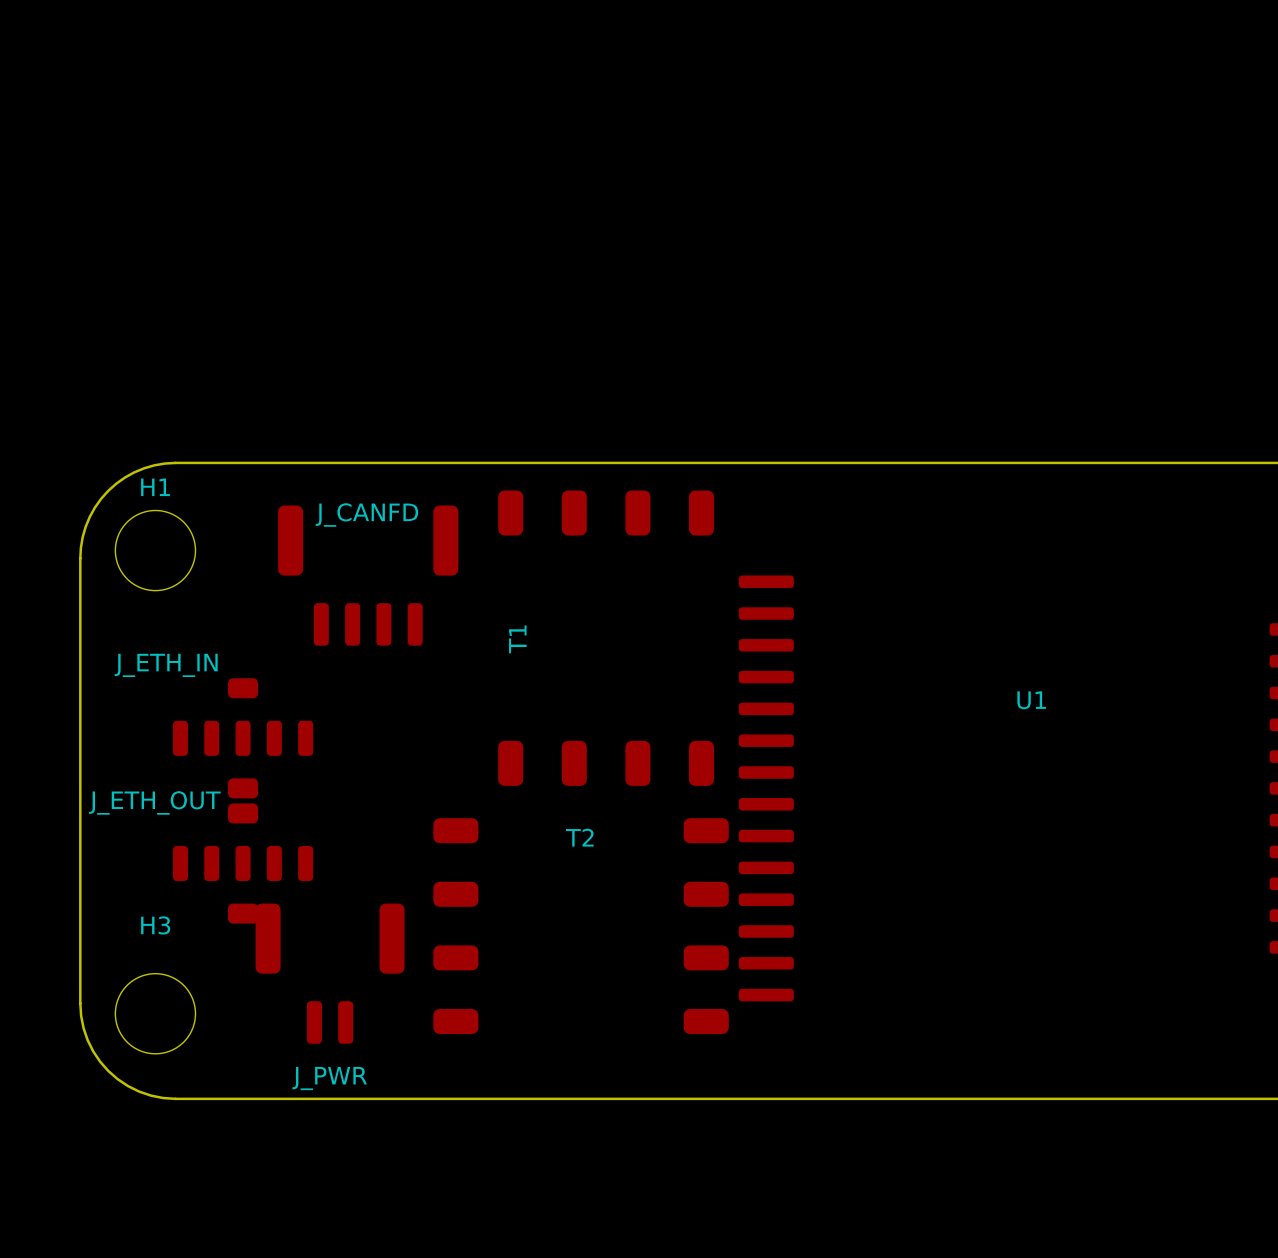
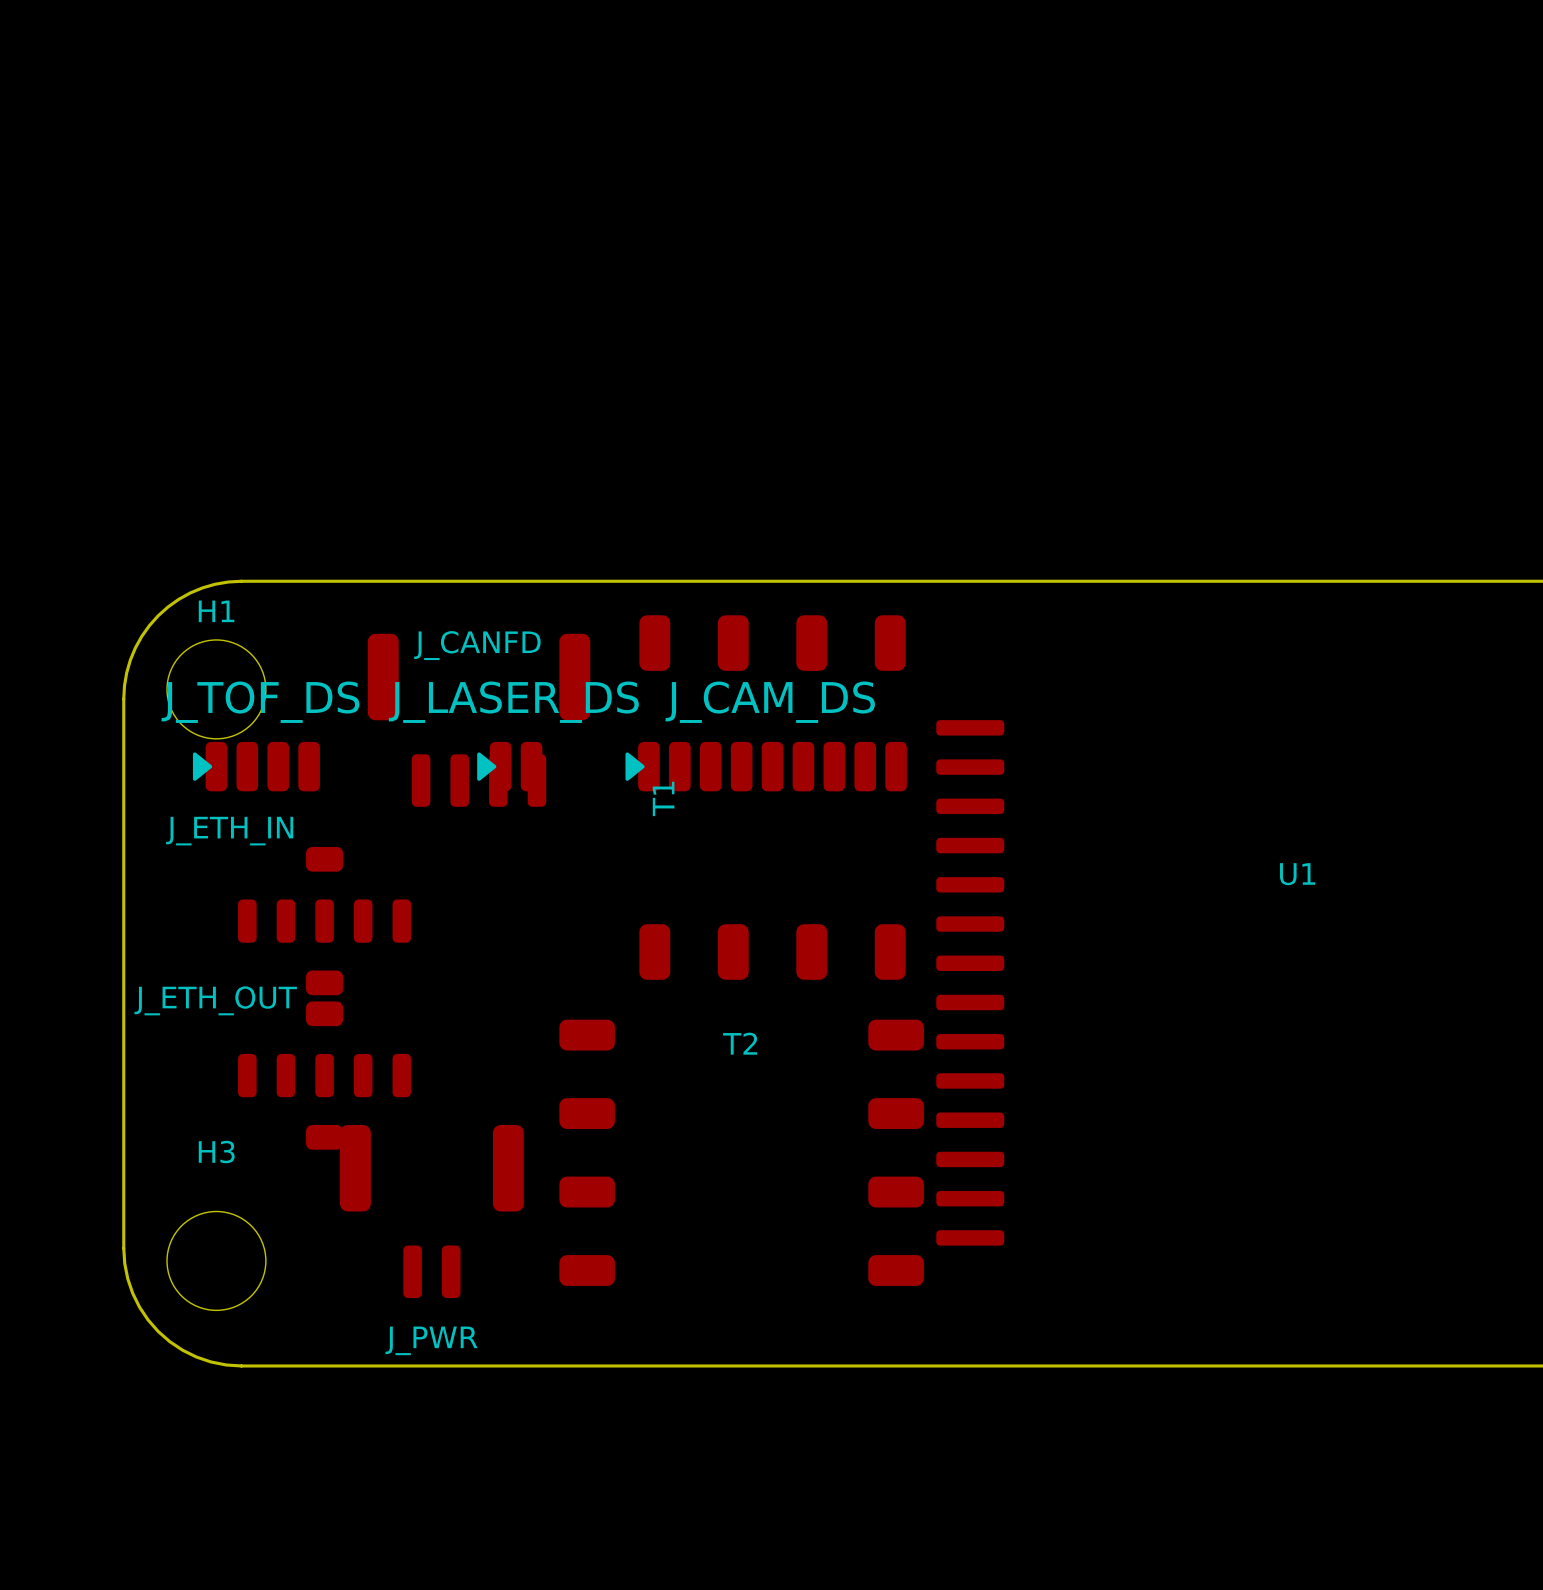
J_TOF_DS: none -> (256, 766)
J_LASER_DS: none -> (509, 766)
J_CAM_DS: none -> (766, 766)

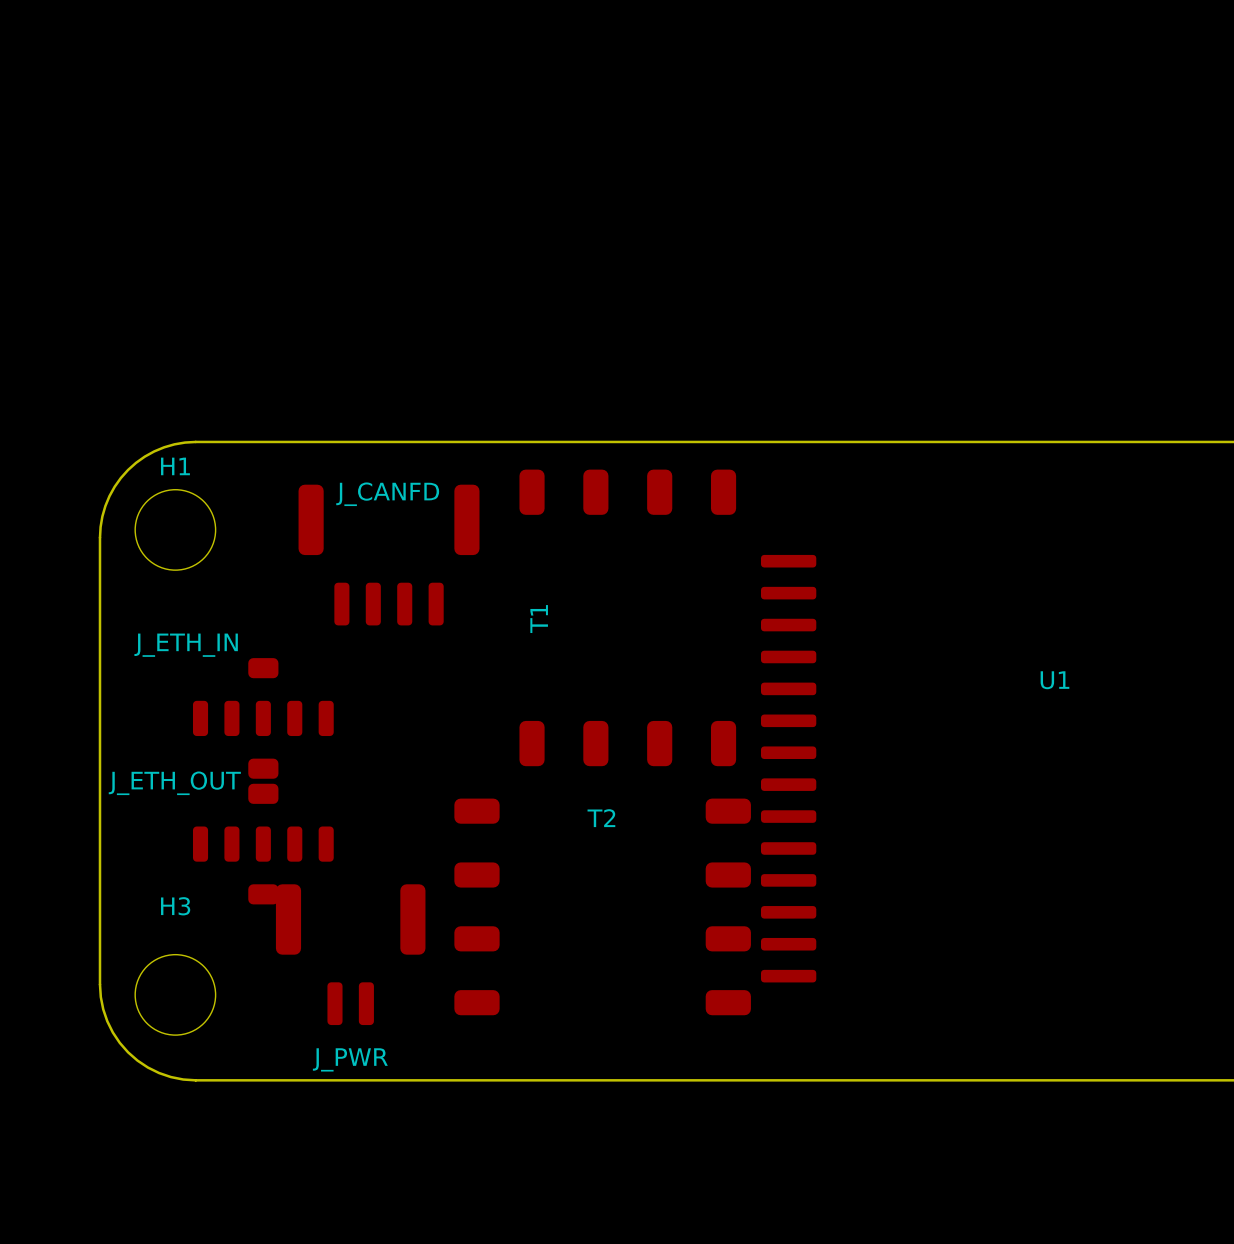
J_TOF_DS: (256, 766) -> none
J_LASER_DS: (509, 766) -> none
J_CAM_DS: (766, 766) -> none

